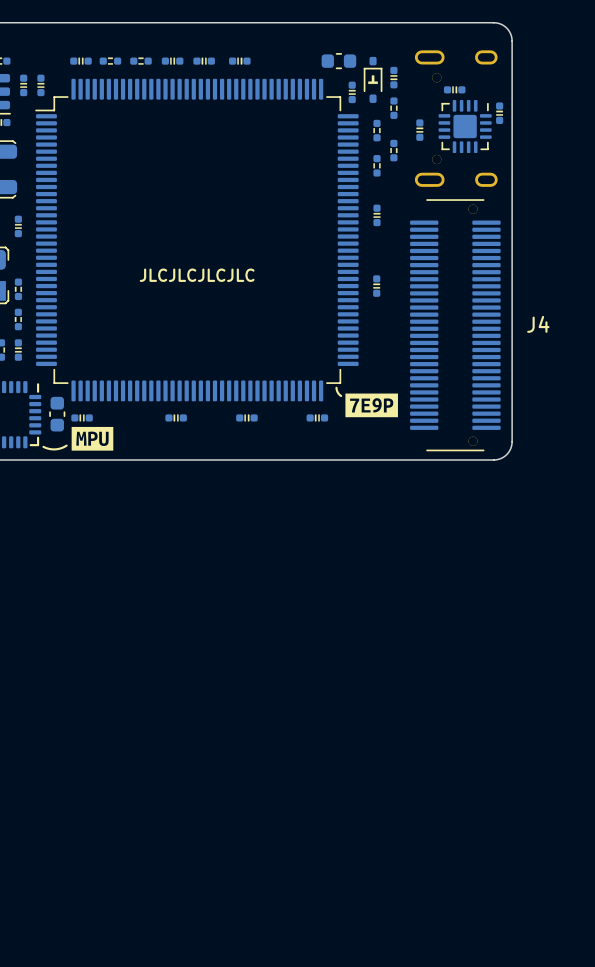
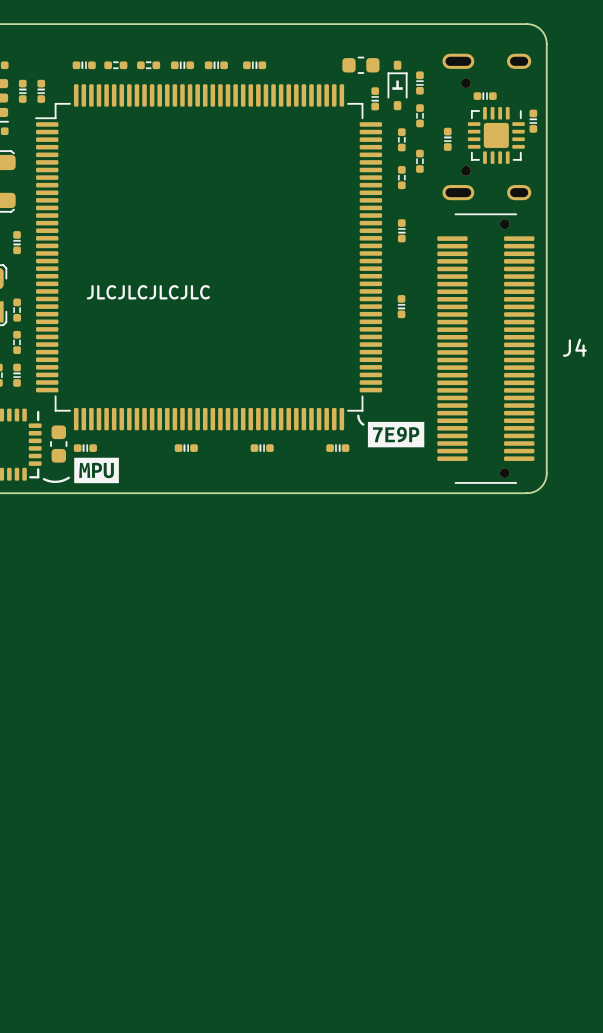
text position: JLCJLCJLCJLC (197, 275) -> JLCJLCJLCJLC (148, 292)

